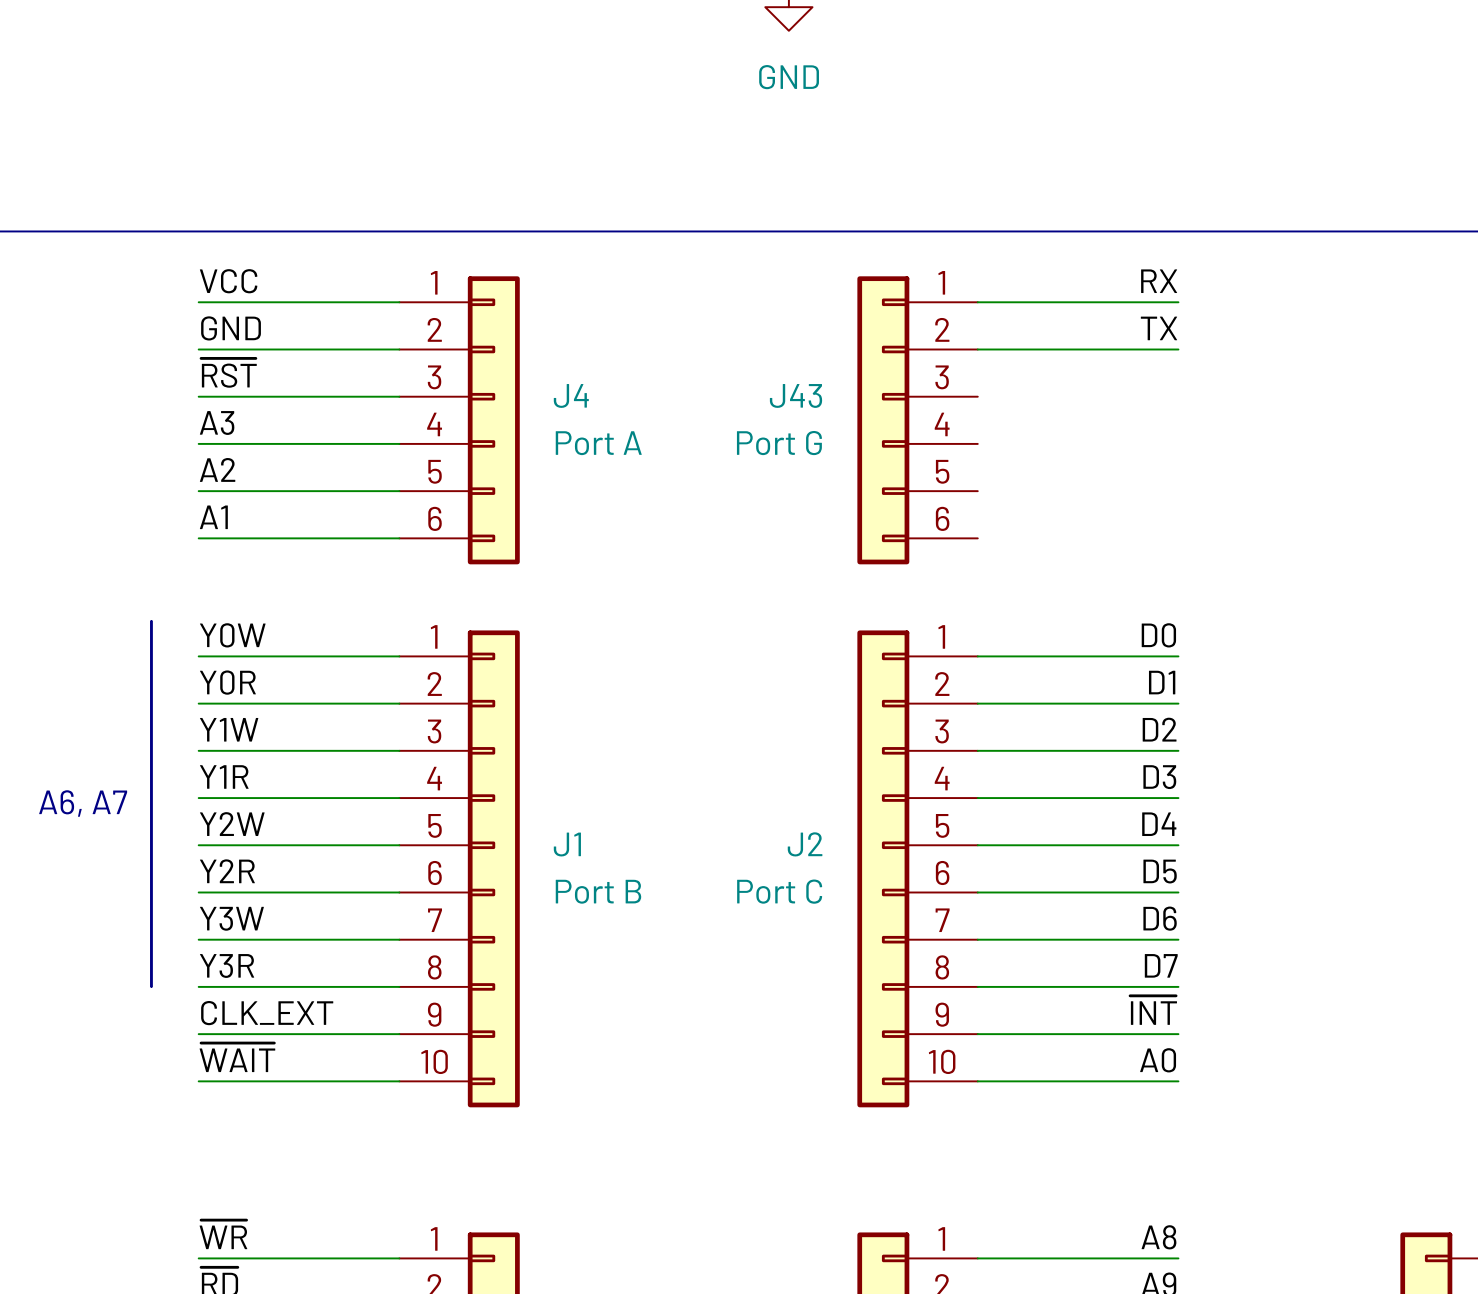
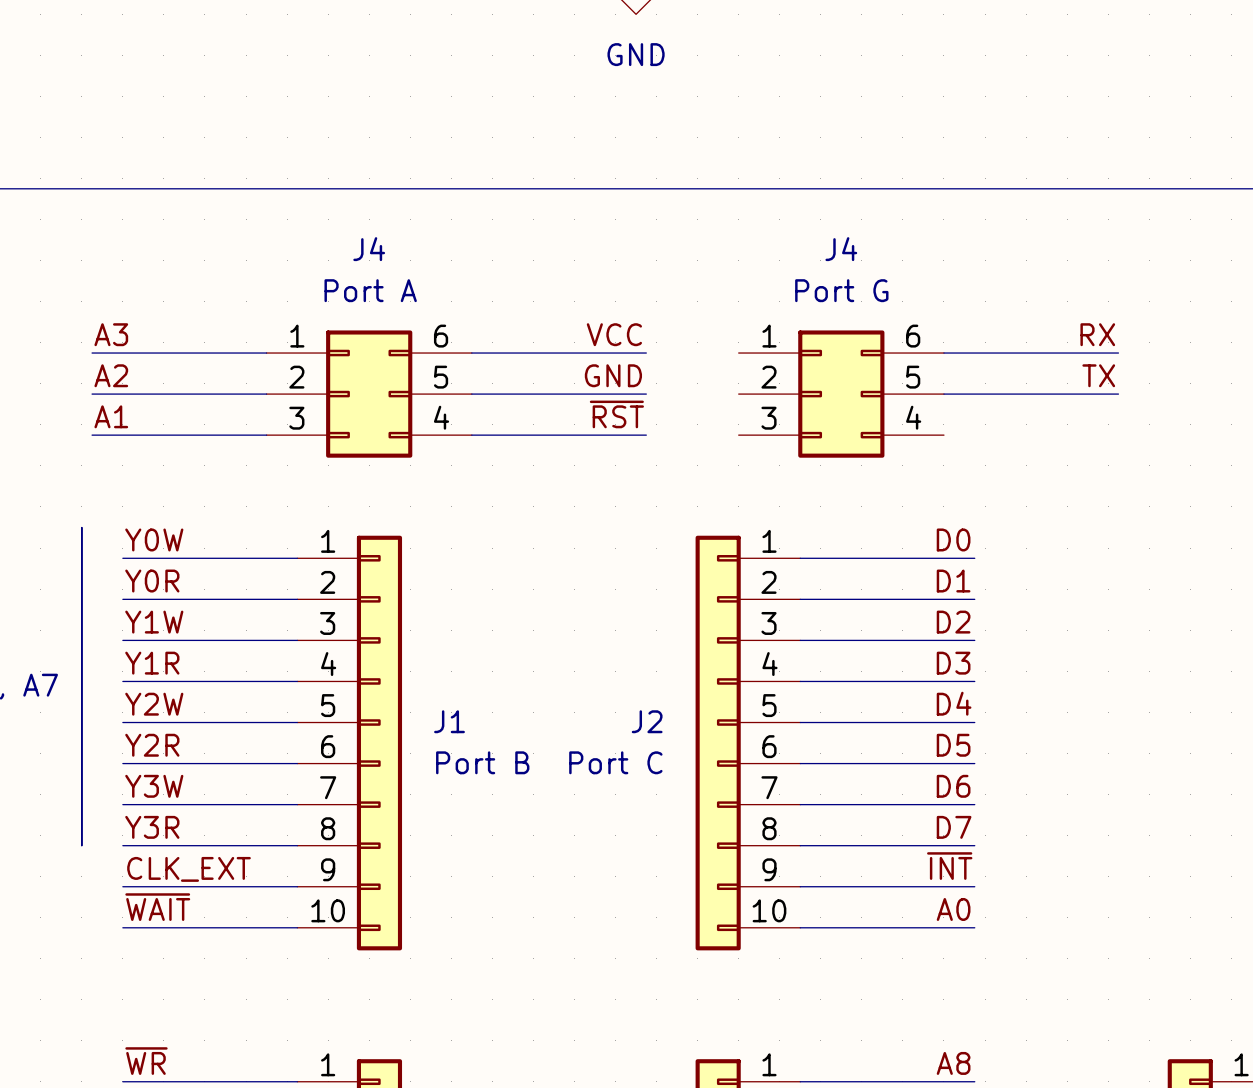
label: VCC (228, 281) -> none
label position: RX (1159, 281) -> RX (1097, 334)
wire: (198, 302) (399, 302) -> (471, 394) (646, 394)
wire: (977, 302) (1178, 302) -> (943, 353) (1118, 353)
label: GND (231, 328) -> none
label position: TX (1159, 328) -> TX (1098, 375)
wire: (198, 349) (399, 349) -> (471, 353) (646, 353)
wire: (977, 349) (1178, 349) -> (943, 394) (1118, 394)
label: ~{RST} (228, 373) -> none
wire: (198, 396) (399, 396) -> (92, 353) (266, 353)
label: none -> VCC (614, 334)
J4: Port A (459, 420) -> none
J43: Port G (917, 420) -> none
label position: A3 (217, 422) -> A3 (111, 334)
wire: (198, 443) (399, 443) -> (92, 394) (266, 394)
label: none -> GND (613, 375)
J4: none -> Port A (369, 394)
J4: none -> Port G (841, 394)
label position: A2 (217, 469) -> A2 (111, 375)
wire: (198, 491) (399, 491) -> (92, 435) (266, 435)
label: none -> ~{RST} (616, 414)
label position: A1 (213, 517) -> A1 (111, 416)
wire: (198, 538) (399, 538) -> (471, 435) (646, 435)

